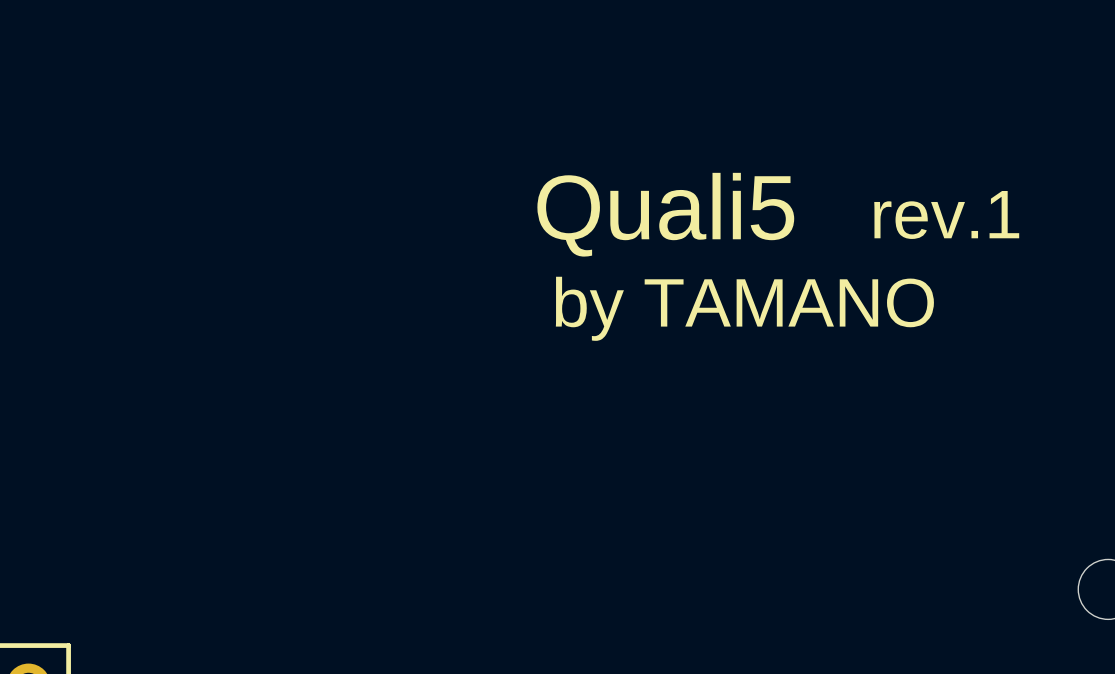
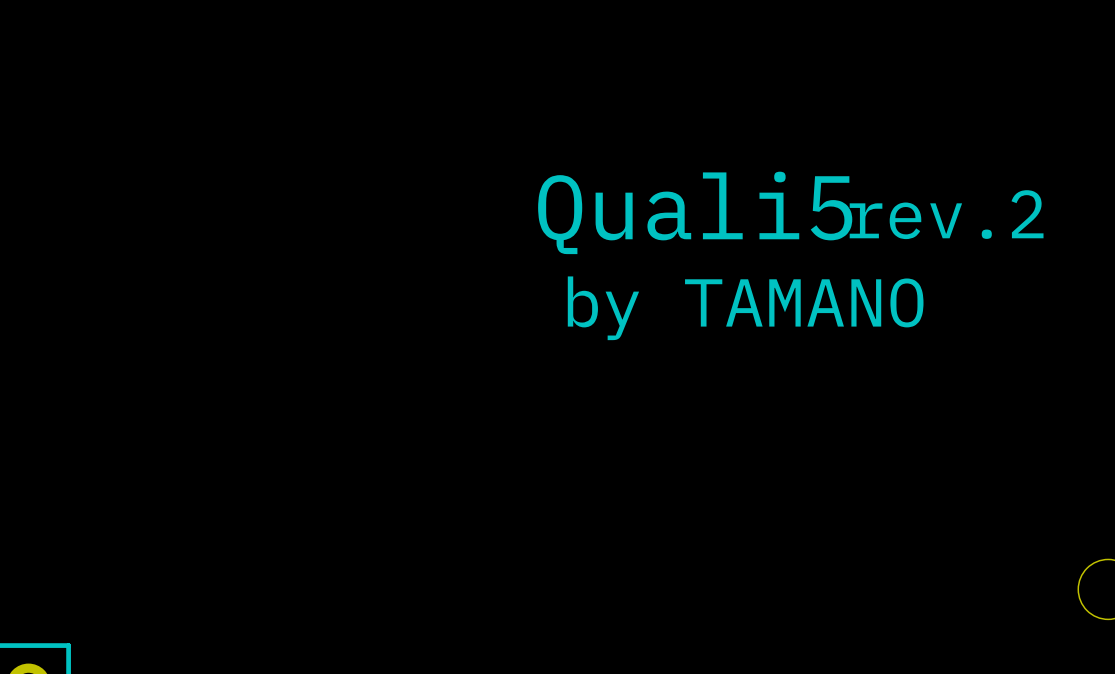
text: rev.1 (946, 214) -> rev.2 (946, 214)

